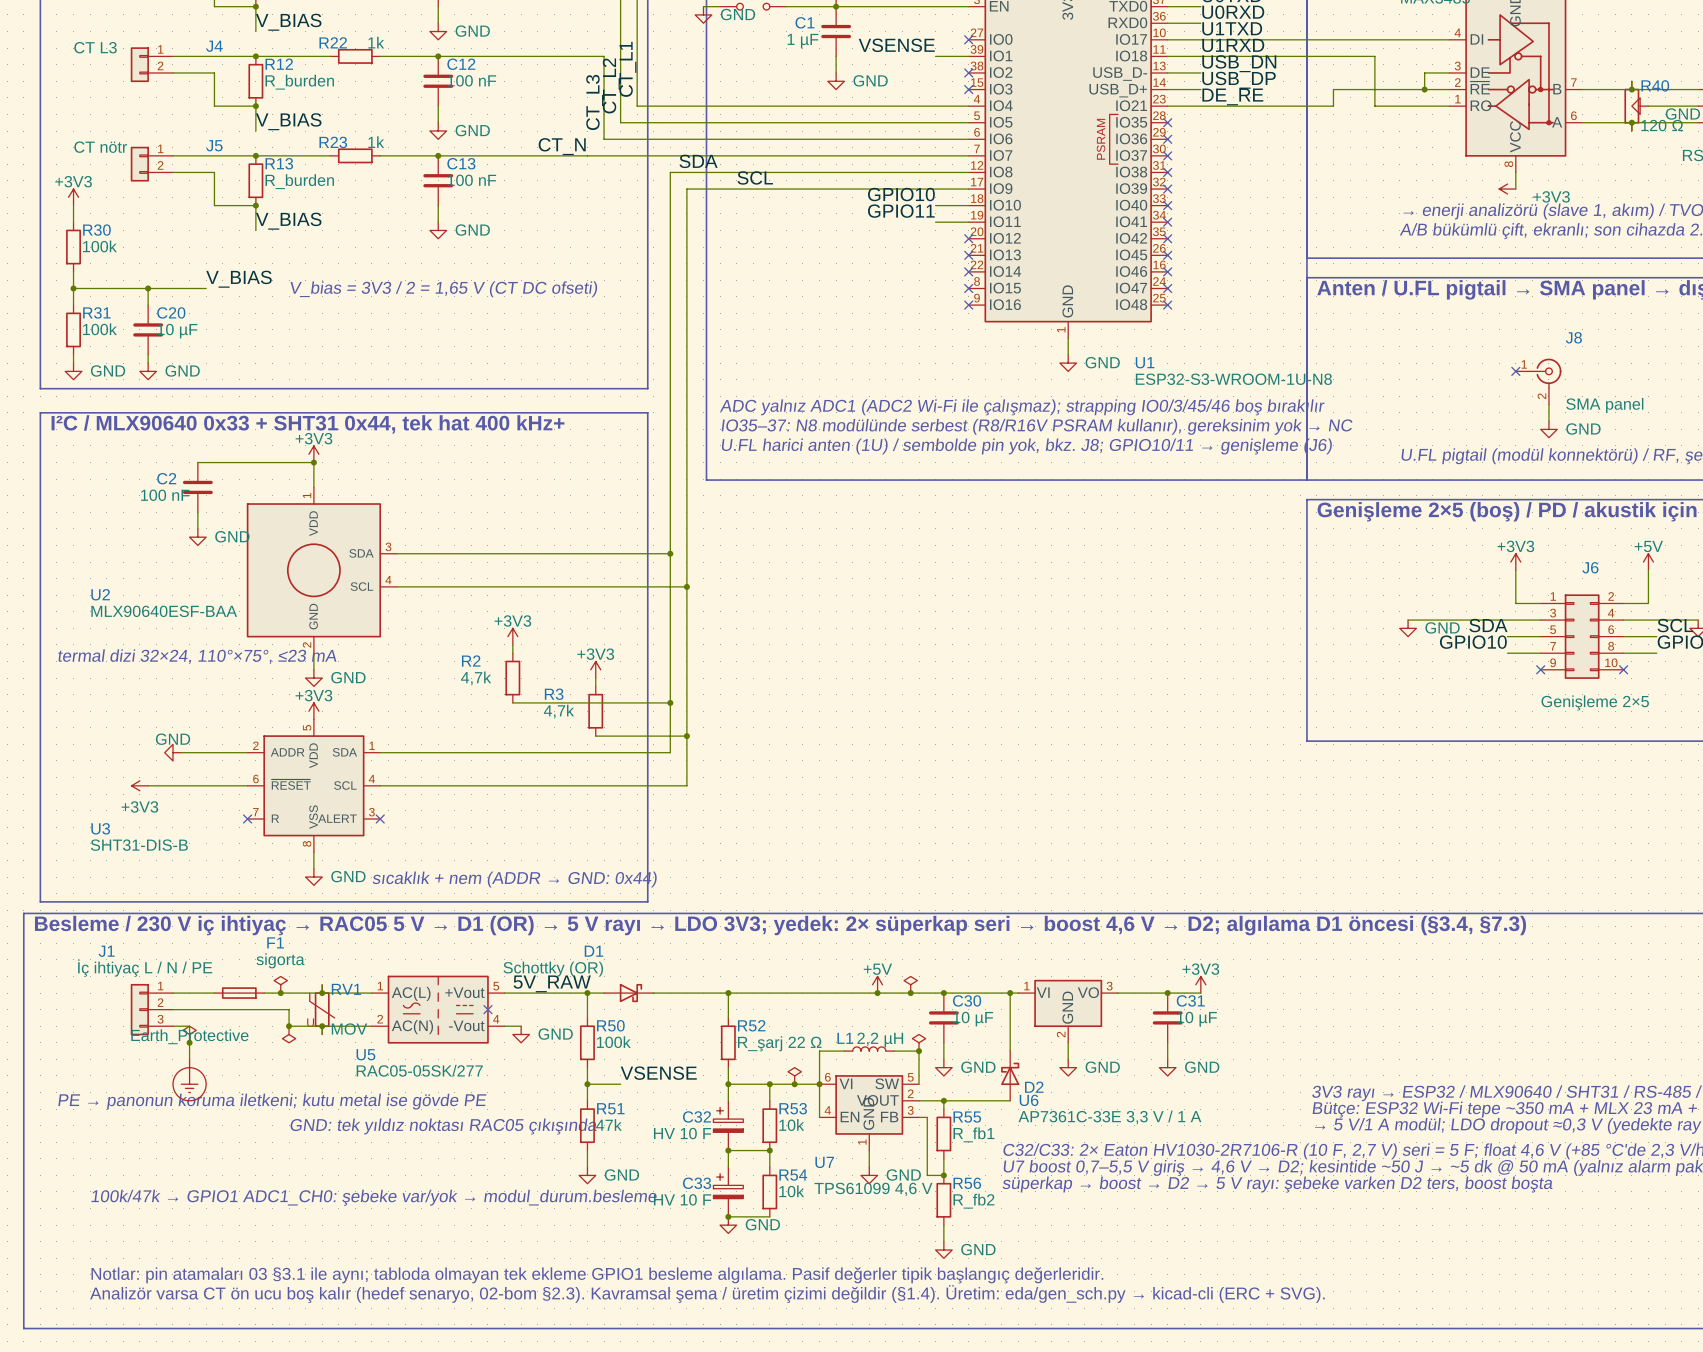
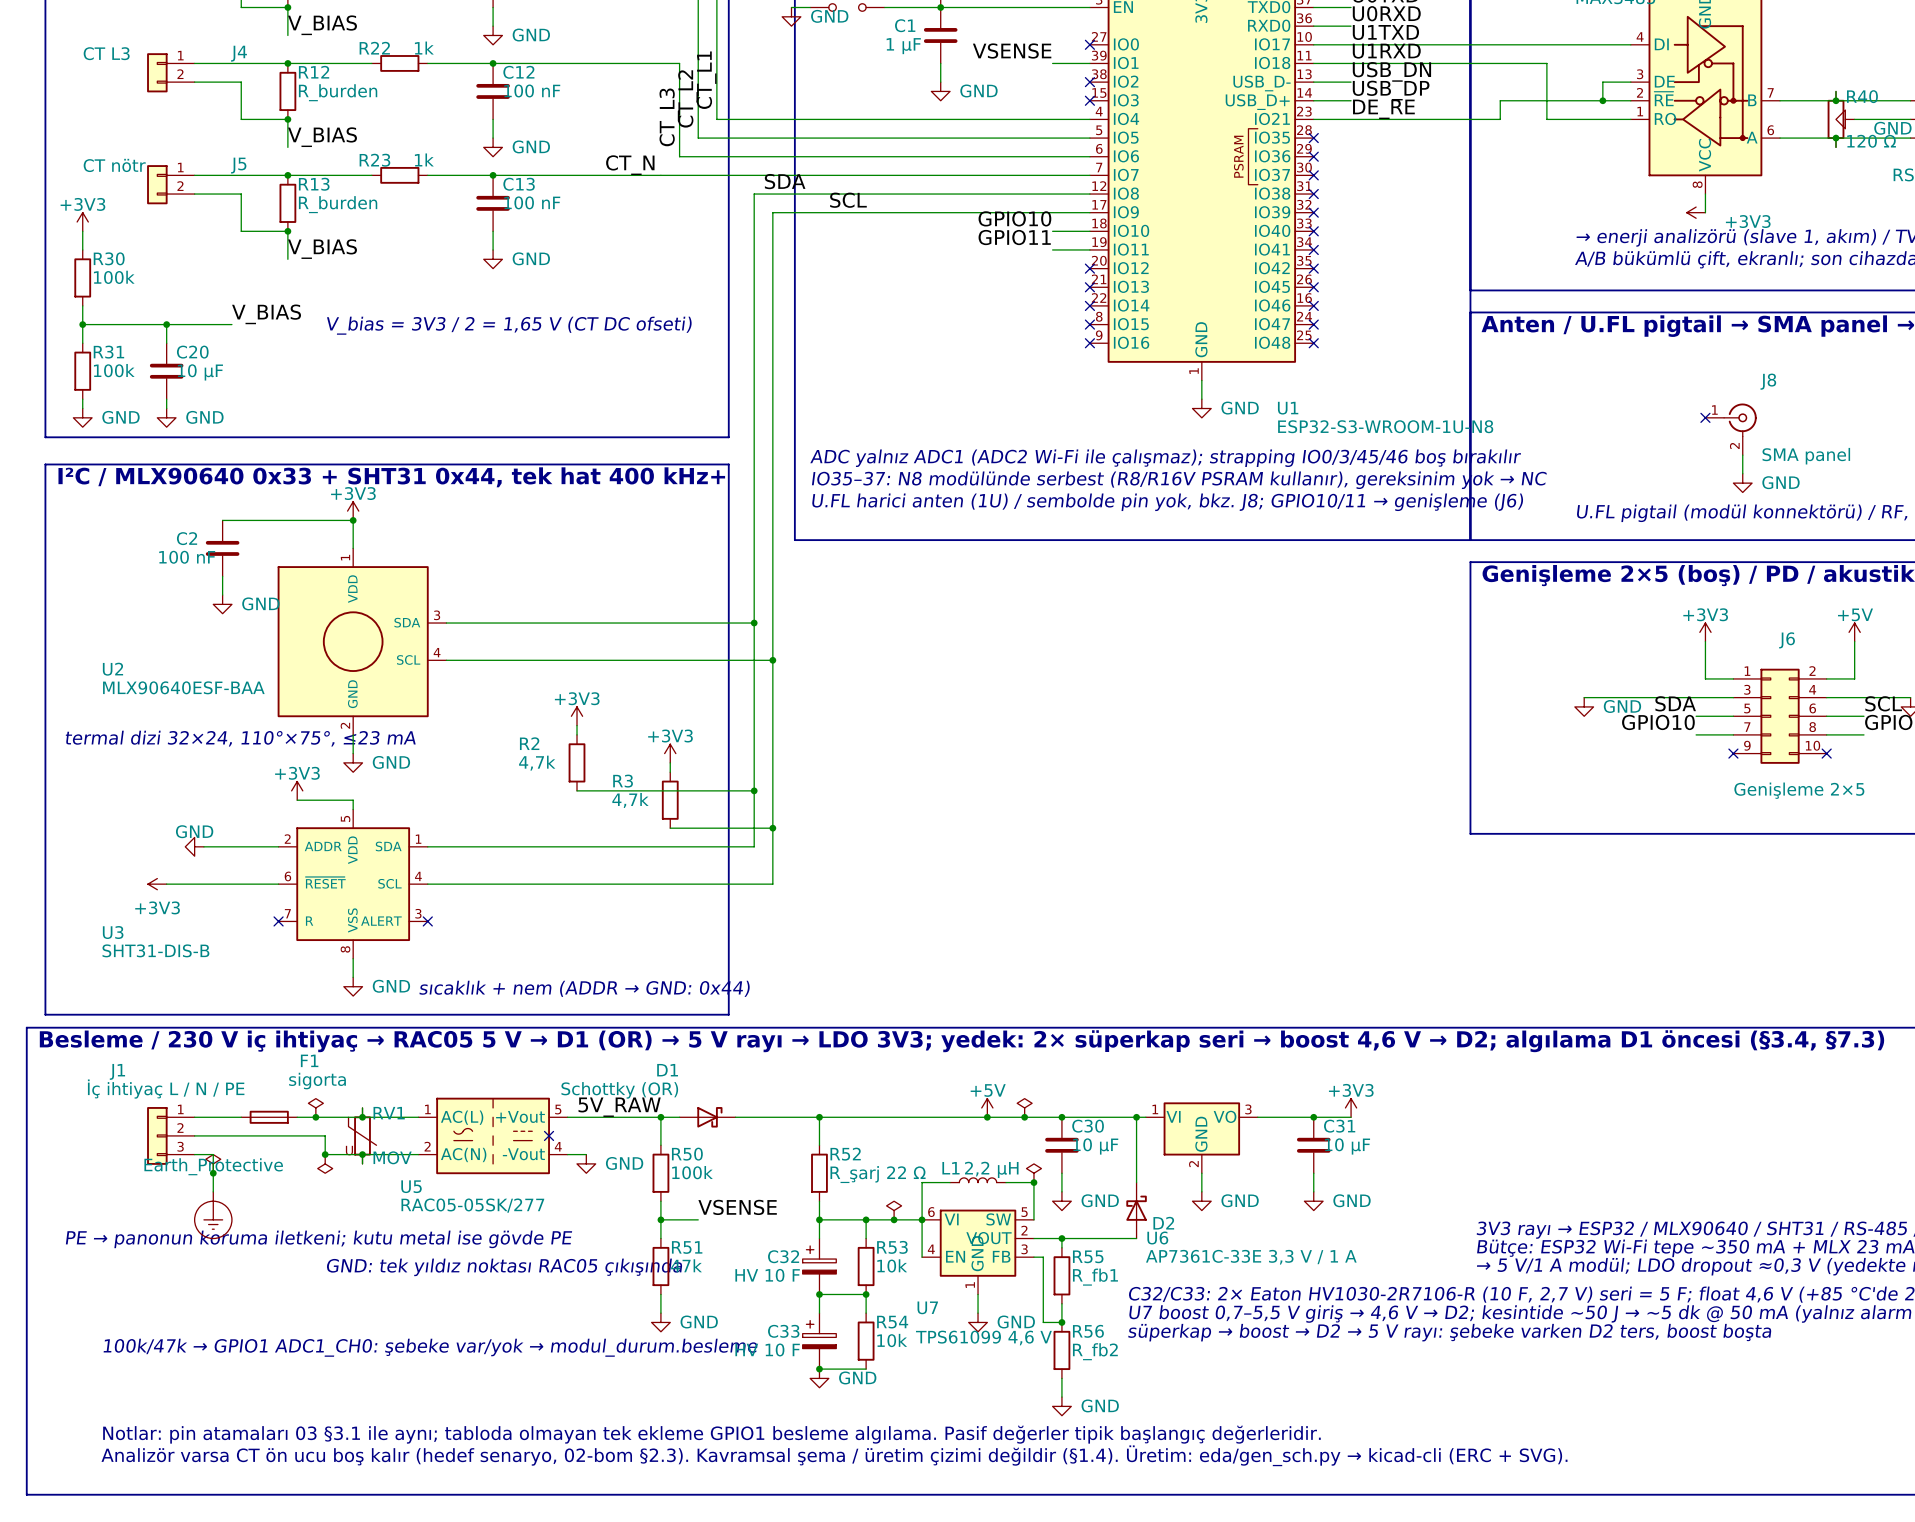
wire: none -> (297, 800) (353, 800) (353, 809)
power symbol position: +3V3 (313, 711) -> +3V3 (297, 790)

